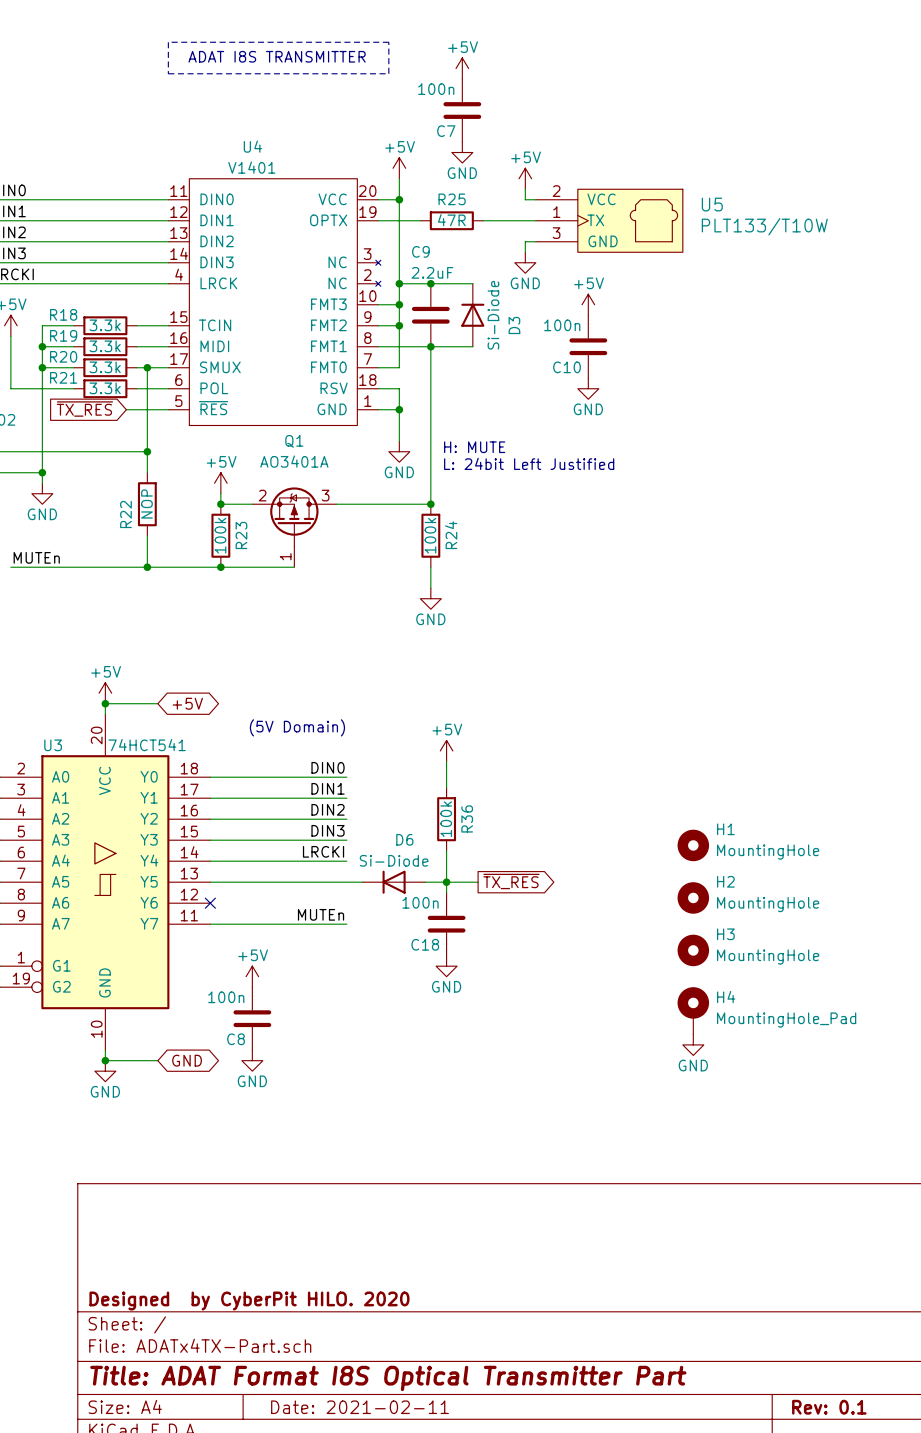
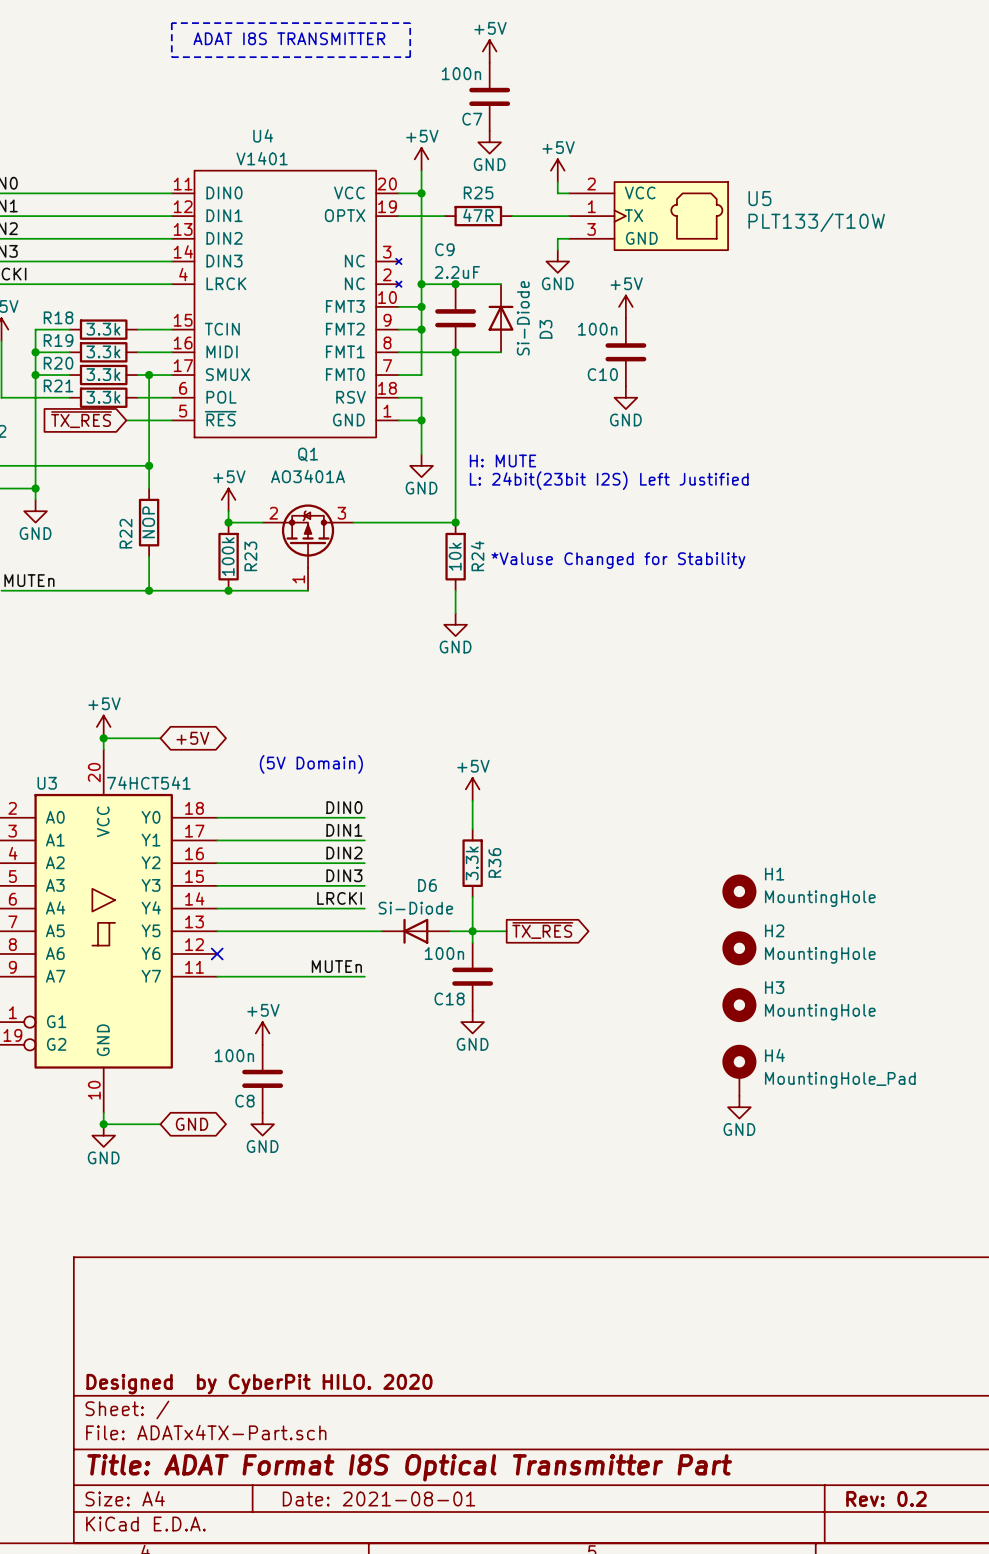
text: L: 24bit Left Justified (529, 463) -> L: 24bit(23bit I2S) Left Justified (609, 480)
R24 value: 100k (430, 535) -> 10k (455, 556)
text: none -> *Valuse Changed for Stability (618, 560)
R36 value: 100k (446, 819) -> 3.3k (472, 863)
title block: Date: 2021-02-11 (359, 1407) -> Date: 2021-08-01 (378, 1498)
title block: Rev: 0.1 (829, 1407) -> Rev: 0.2 (886, 1498)

